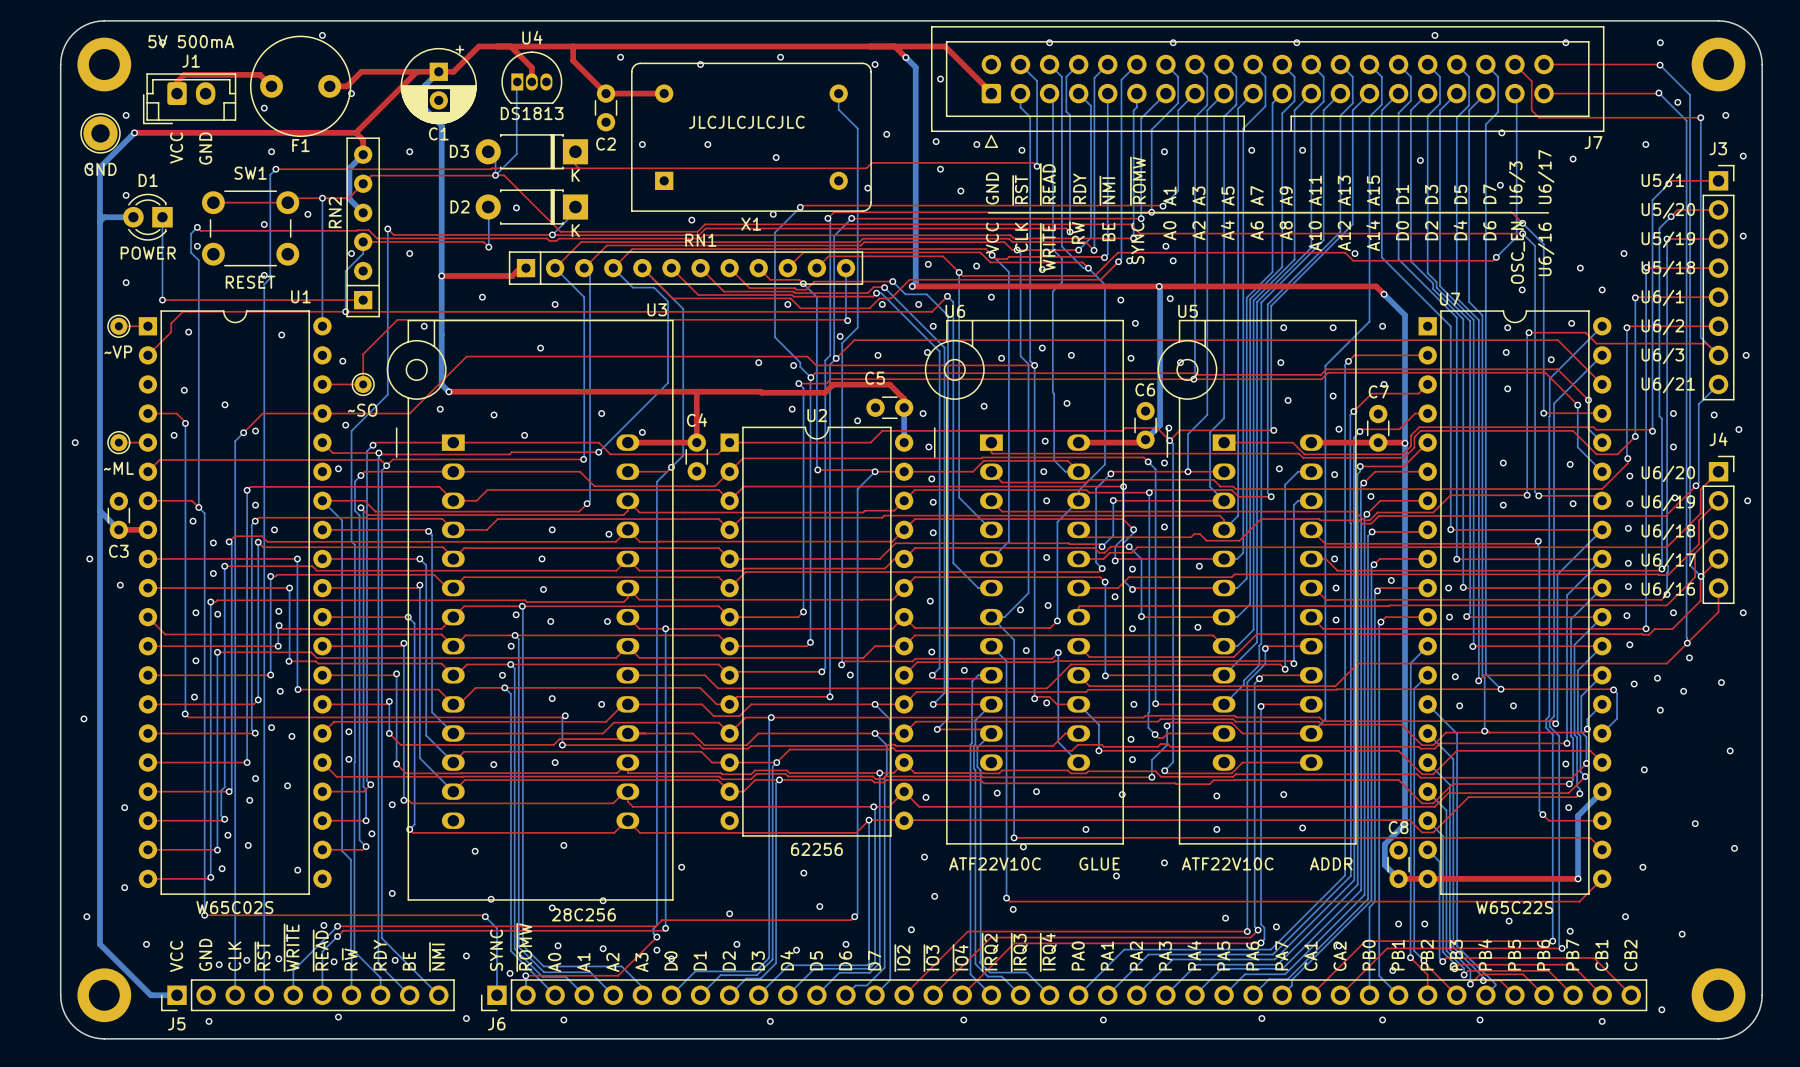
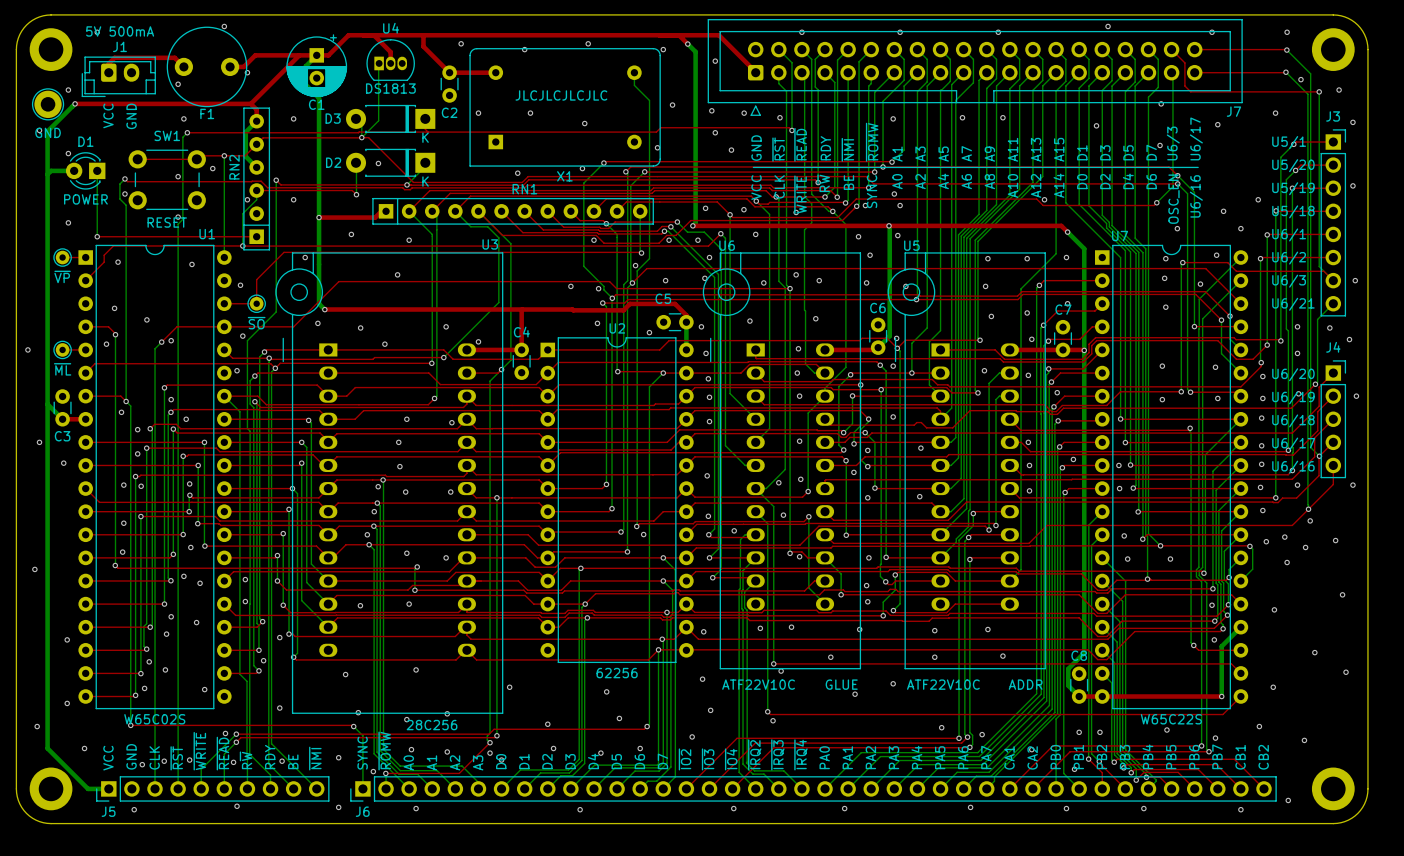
part value: ~VP (118, 352) -> ~{VP} (62, 276)
part value: ~SO (362, 410) -> ~{SO} (256, 323)
part value: ~ML (118, 468) -> ~{ML} (62, 369)

